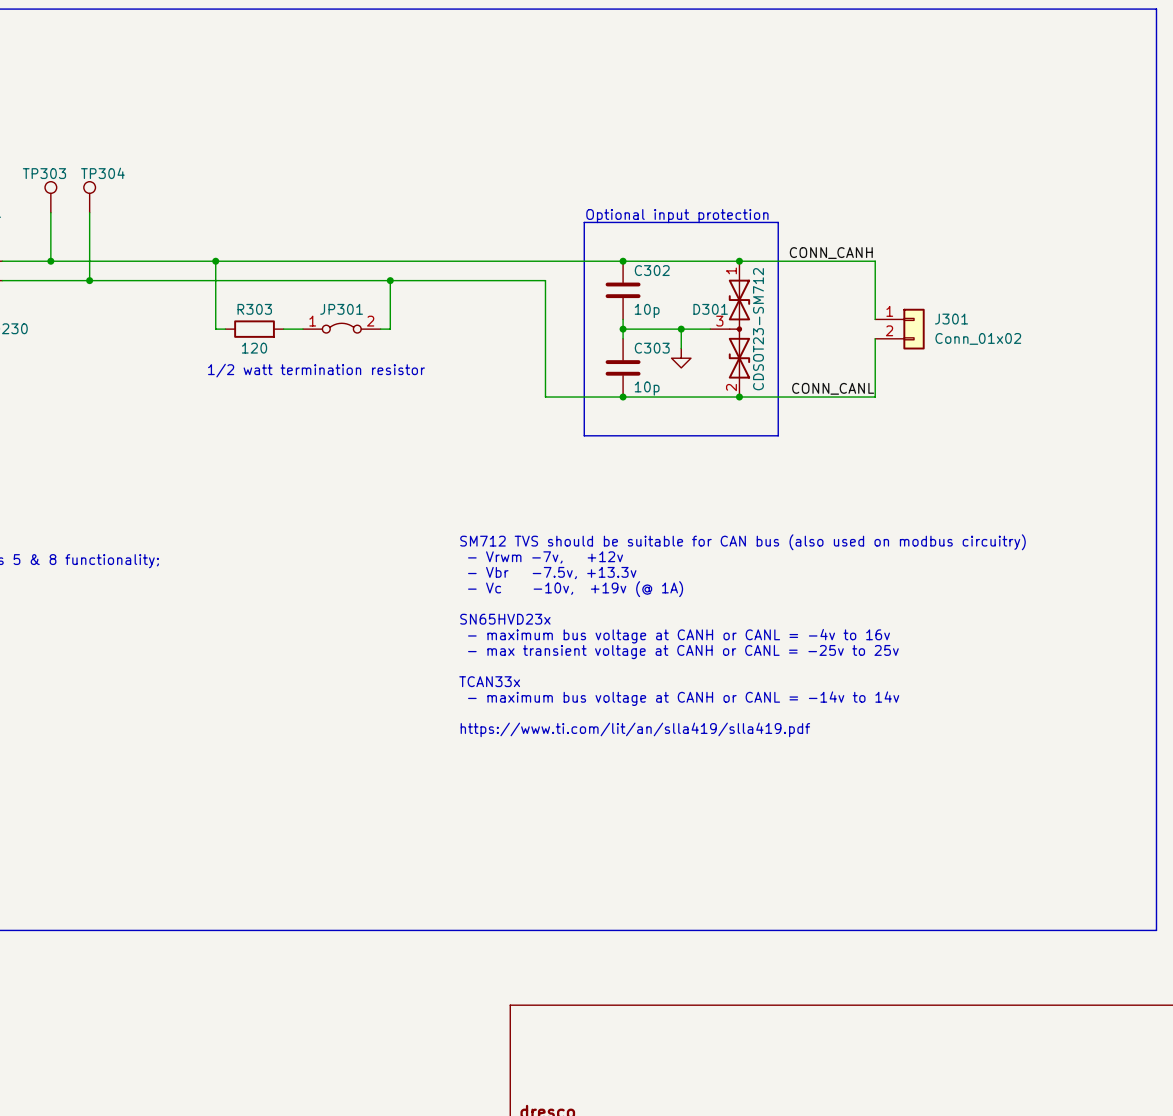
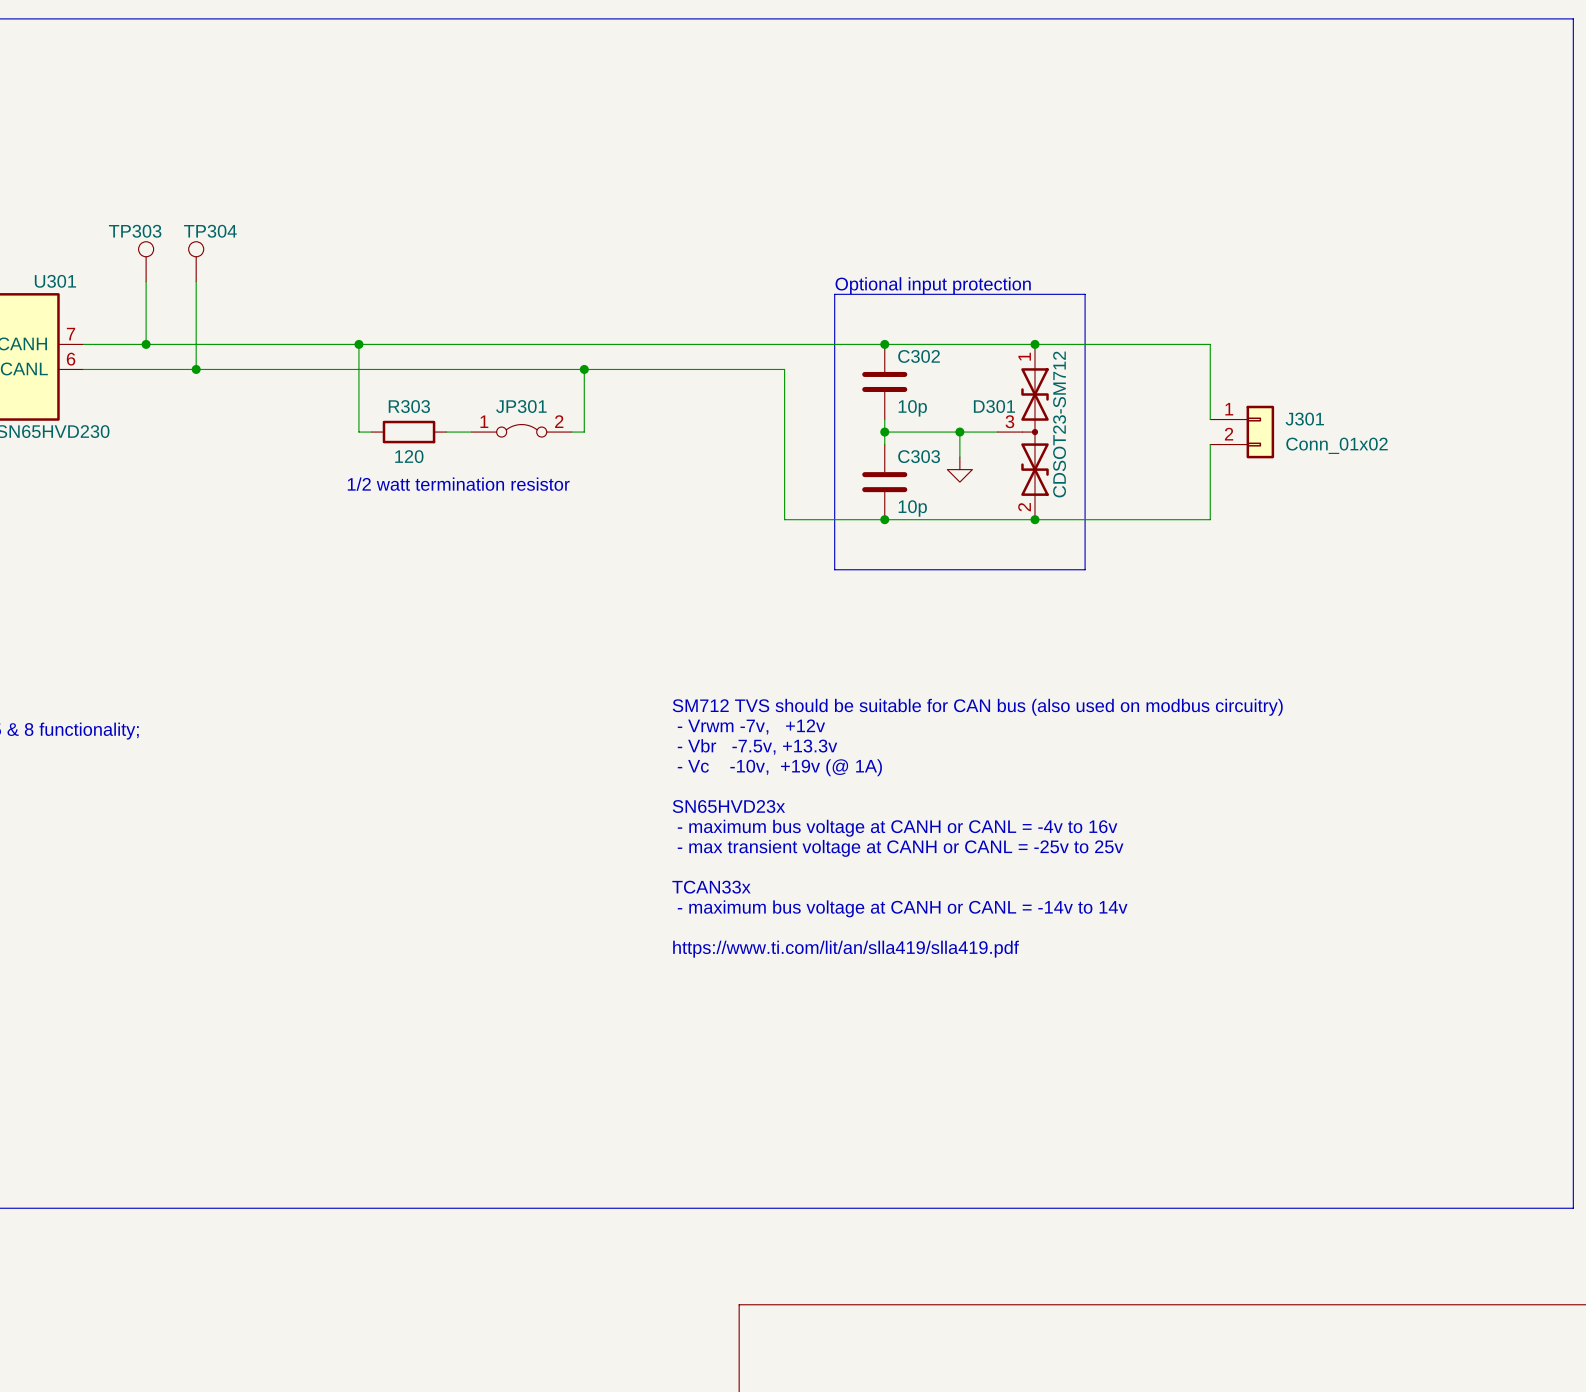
label: CONN_CANH (831, 253) -> none
label: CONN_CANL (833, 388) -> none

